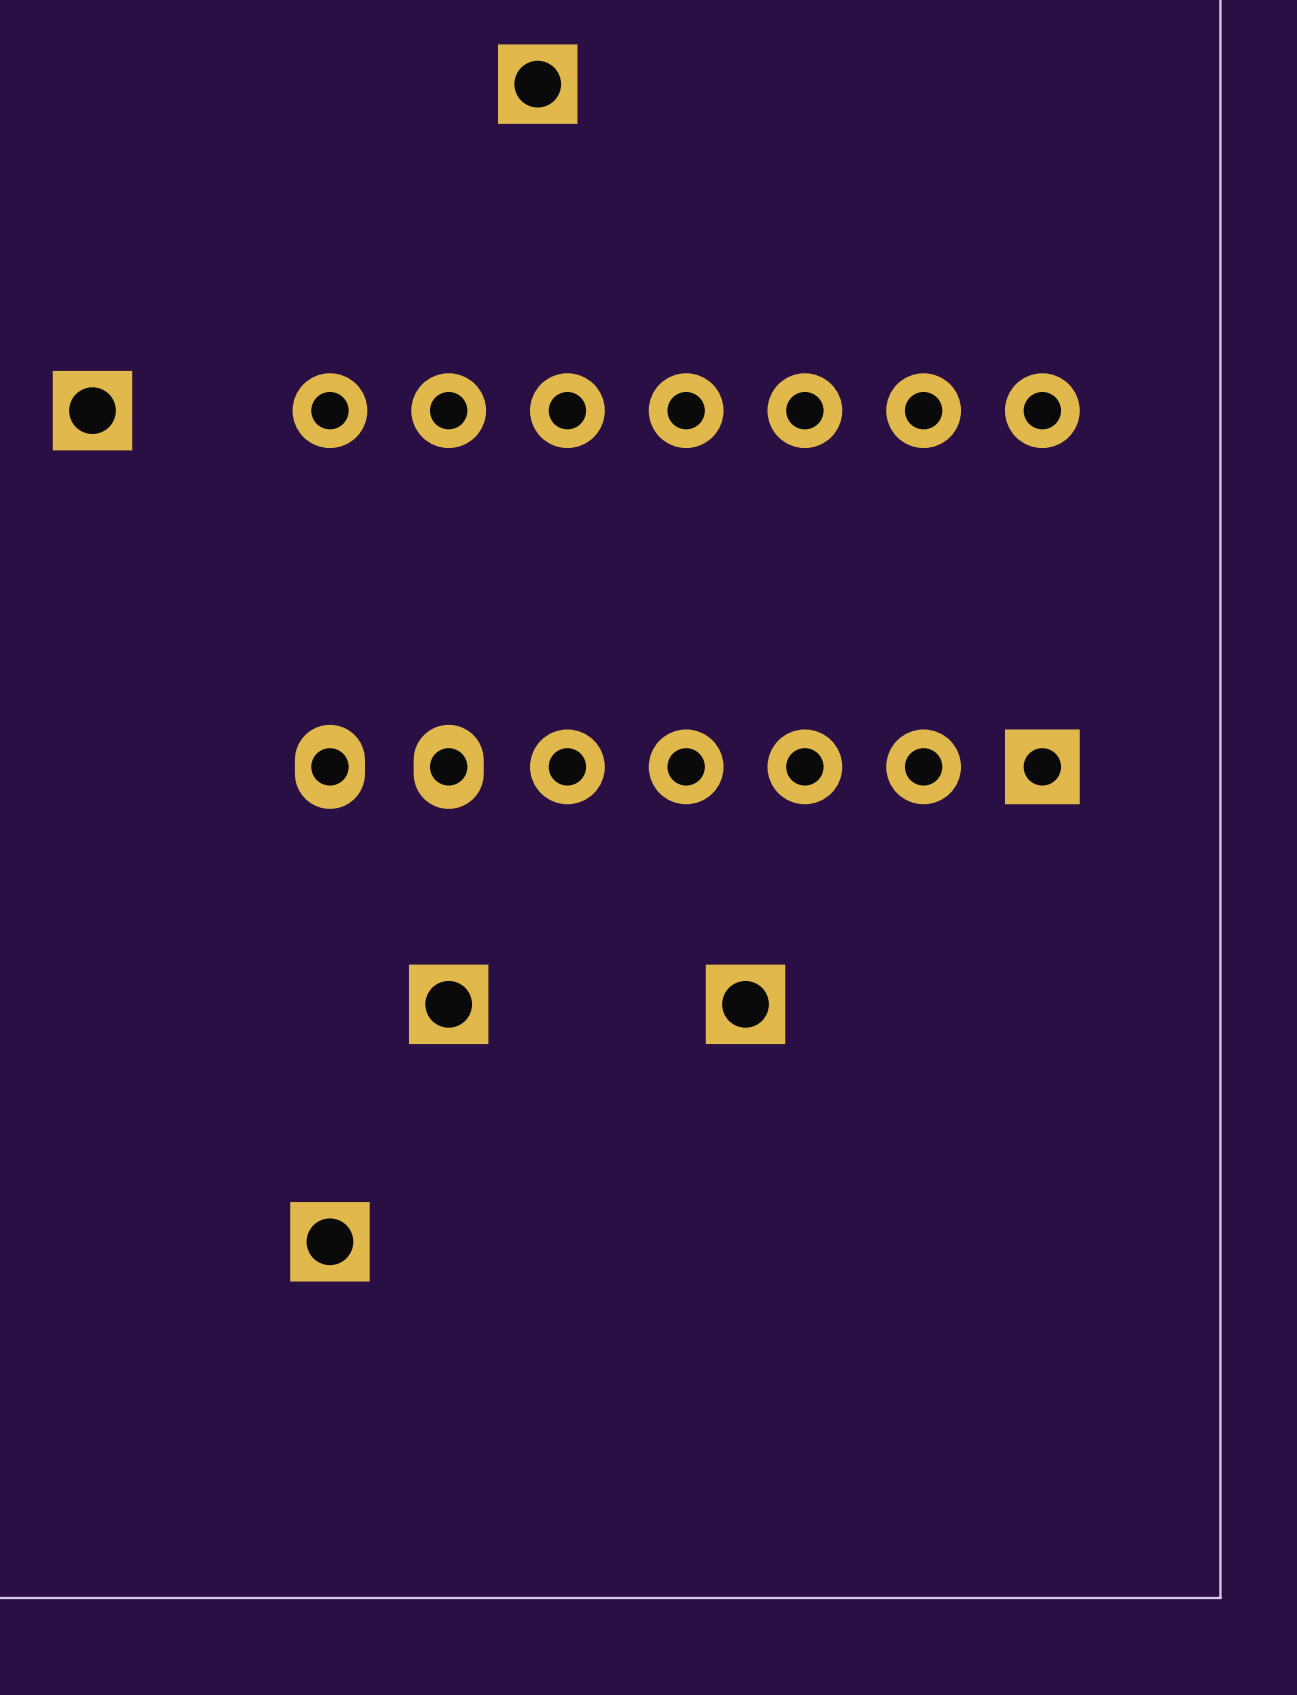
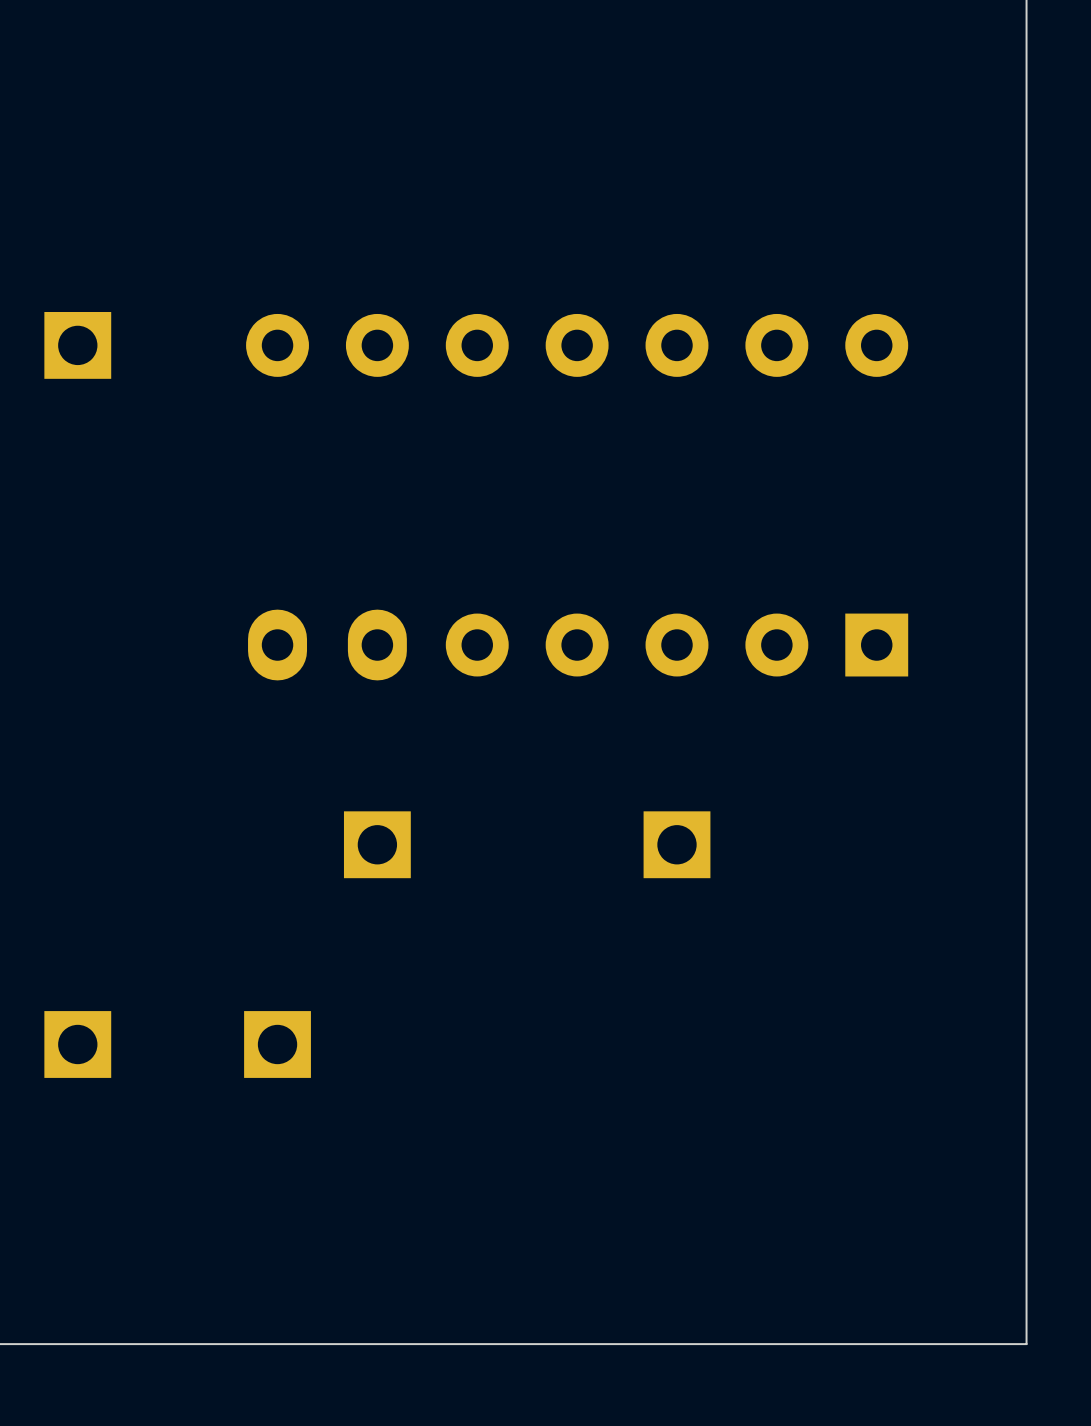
part: (537, 84) -> none
part position: (745, 1004) -> (677, 844)
part: none -> (77, 1044)

